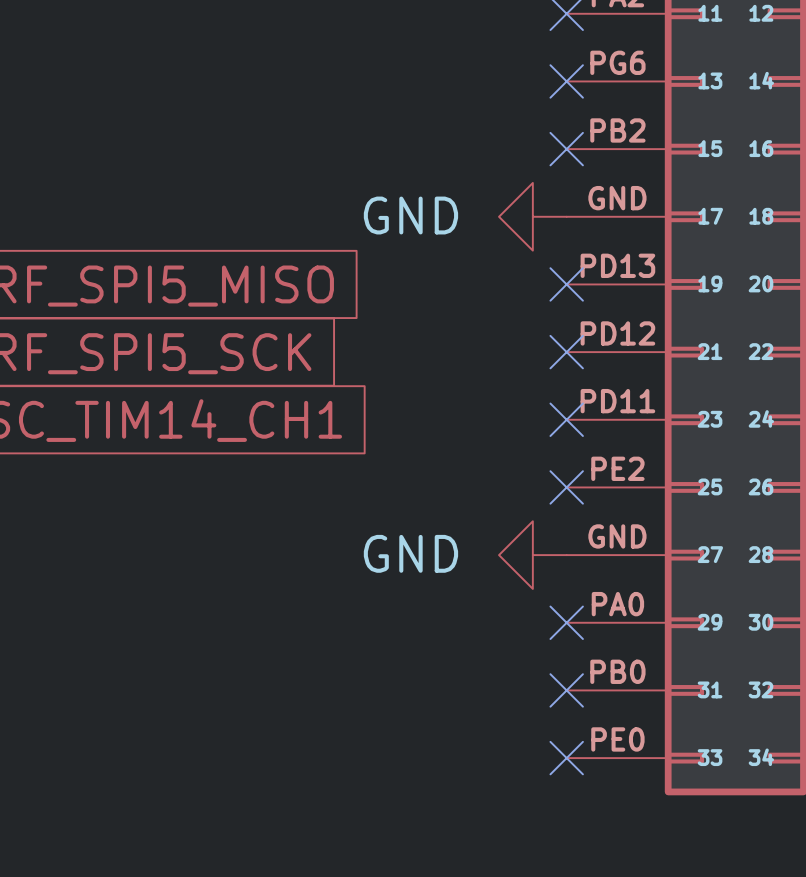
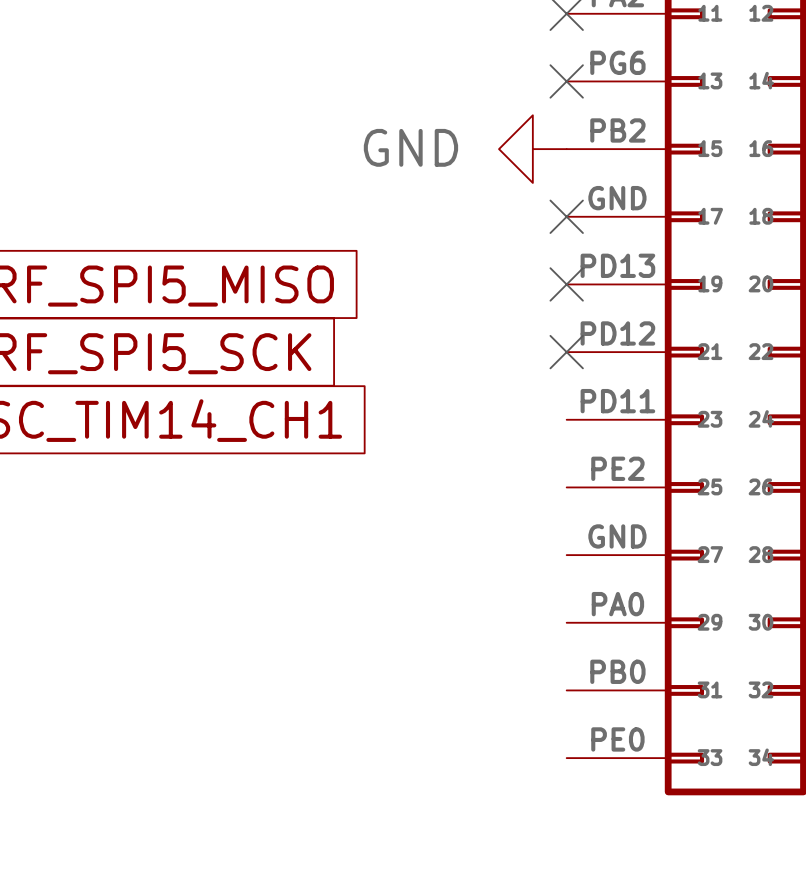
no-connect mark position: (566, 149) -> (566, 216)
power symbol position: GND (532, 216) -> GND (532, 149)
no-connect mark: (566, 419) -> none
no-connect mark: (566, 487) -> none
power symbol: GND (532, 555) -> none
no-connect mark: (566, 622) -> none
no-connect mark: (566, 690) -> none
no-connect mark: (566, 758) -> none

